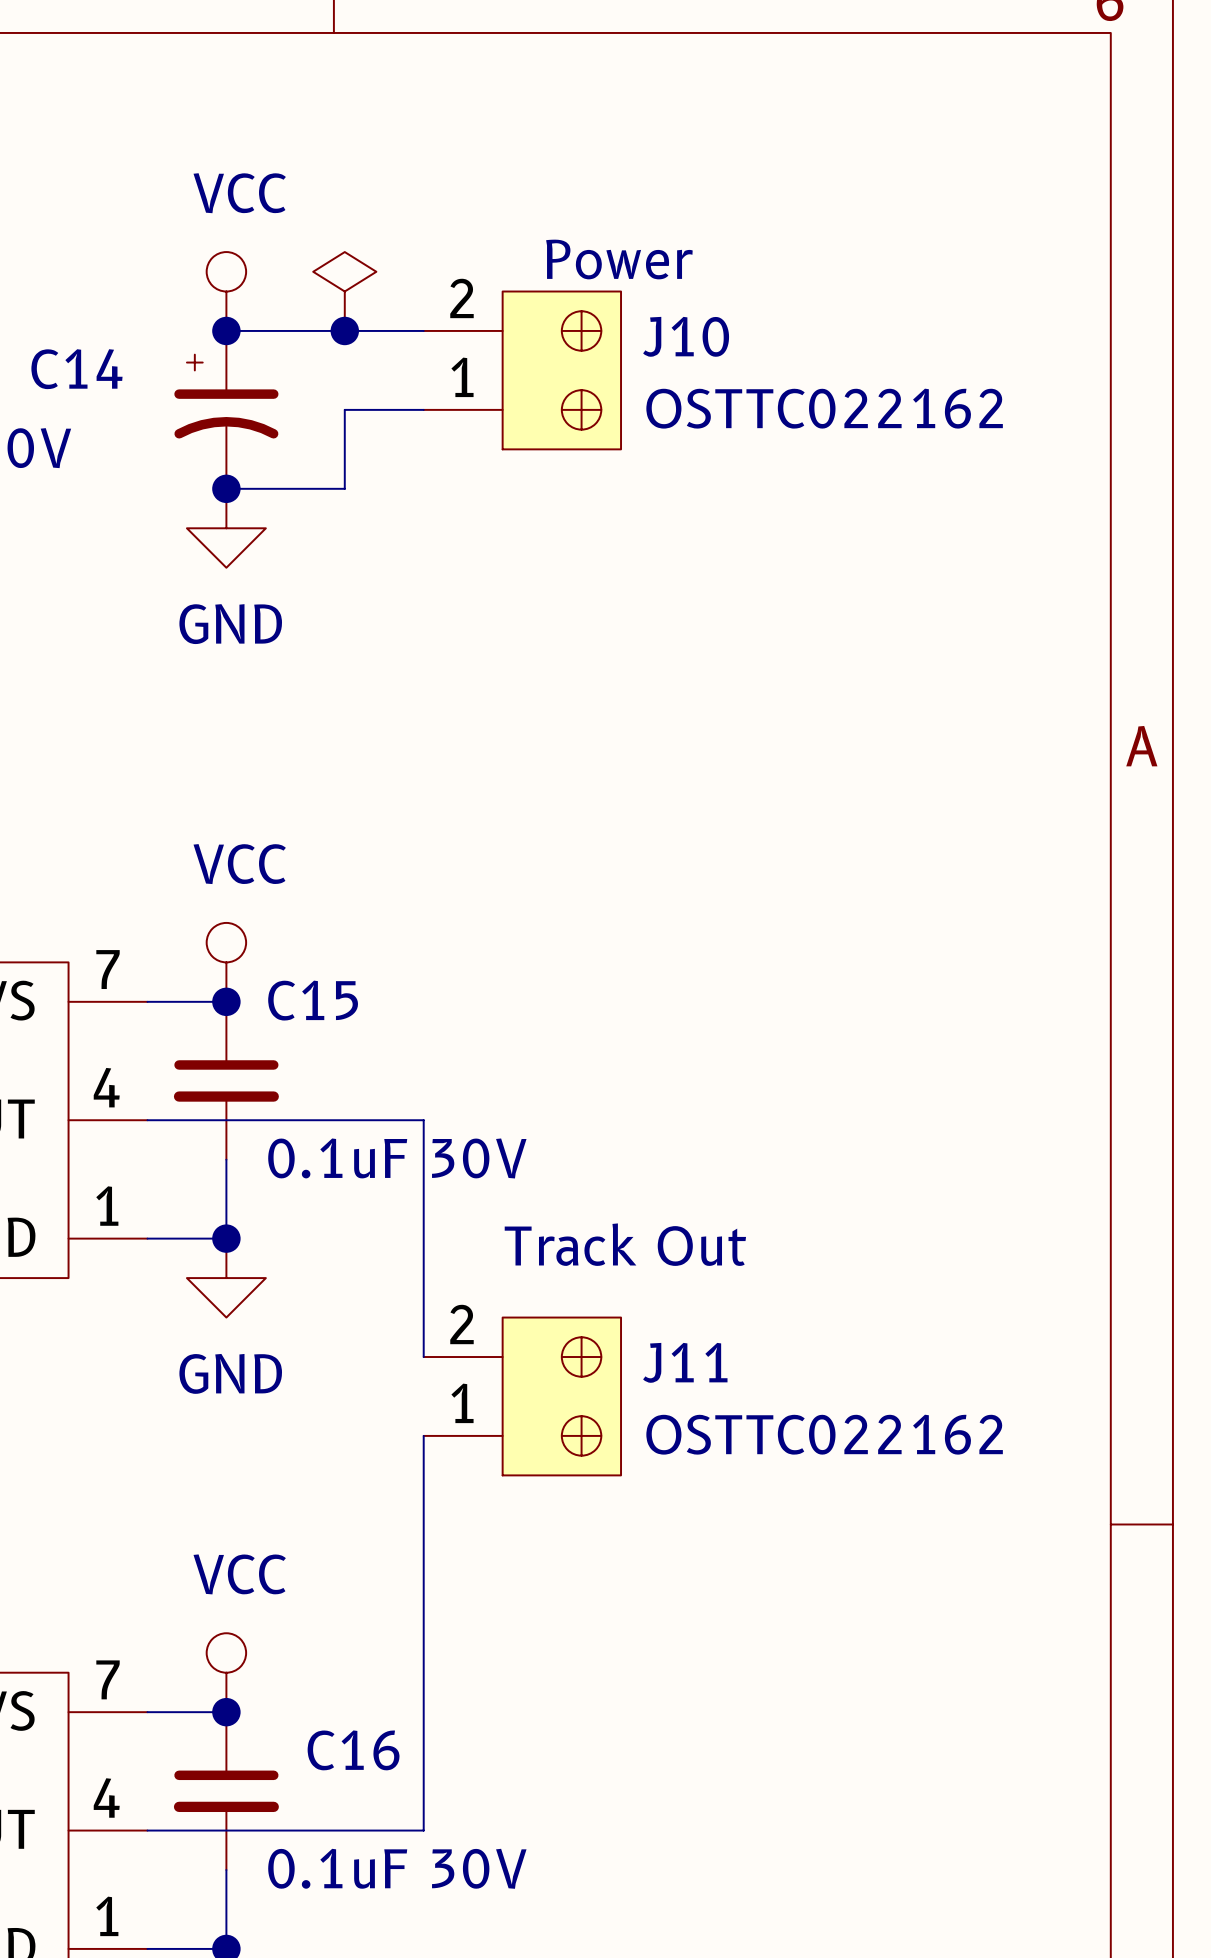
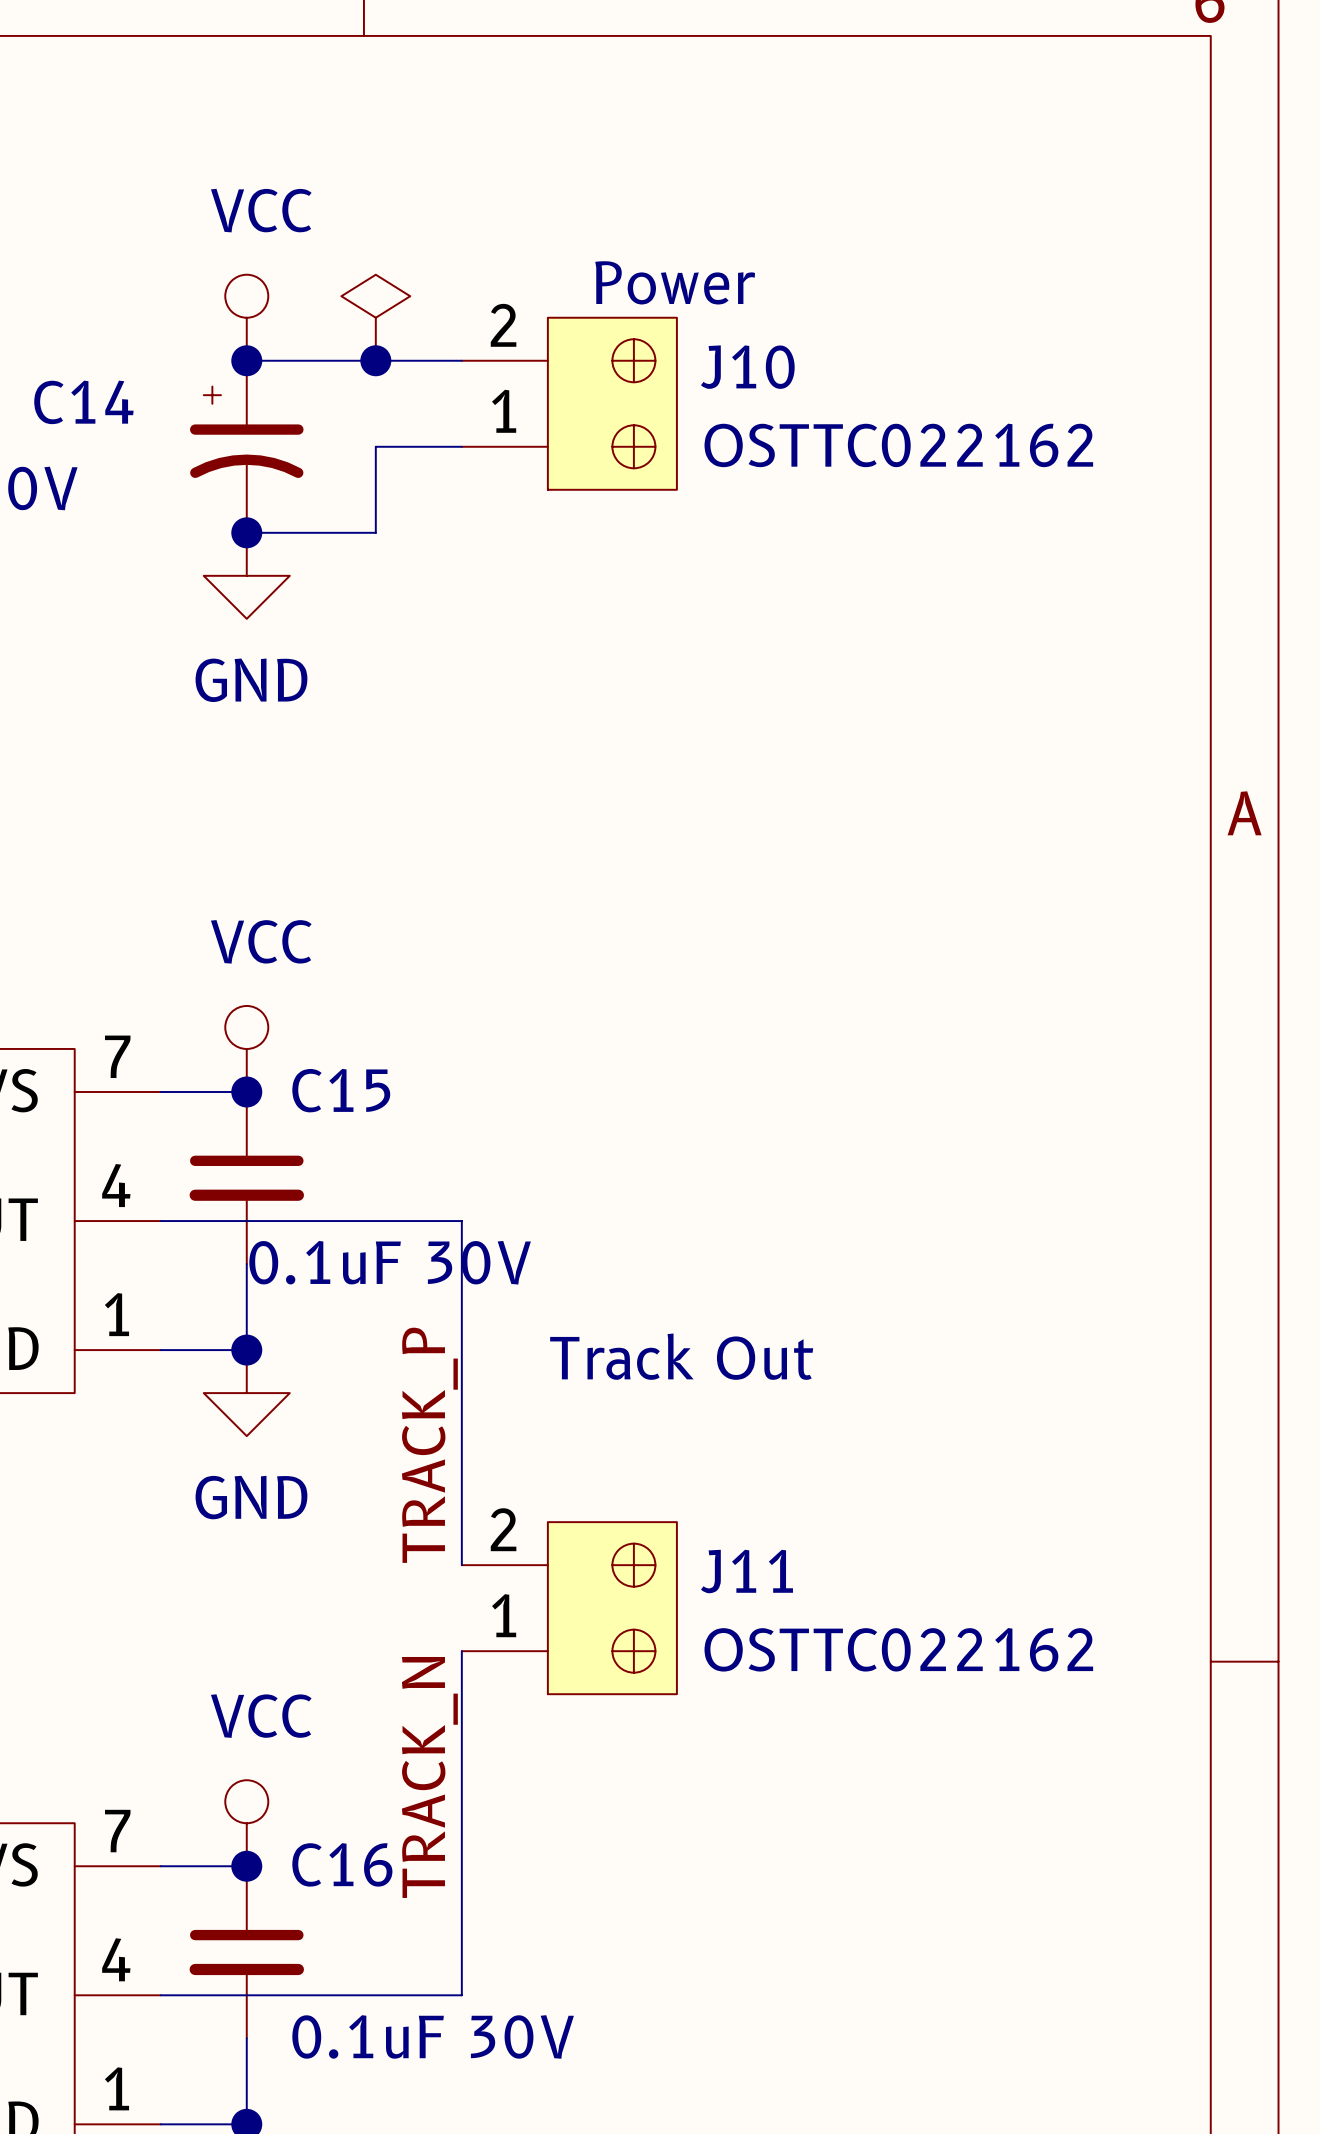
C15 value position: 0.1uF 30V (397, 1158) -> 0.1uF 30V (390, 1262)
label: none -> TRACK_P (429, 1445)
J11 position: (522, 1396) -> (569, 1608)
wire: (423, 1435) (423, 1514) -> (461, 1565) (461, 1479)
label: none -> TRACK_N (429, 1777)
C16 name position: C16 (353, 1750) -> C16 (342, 1864)

